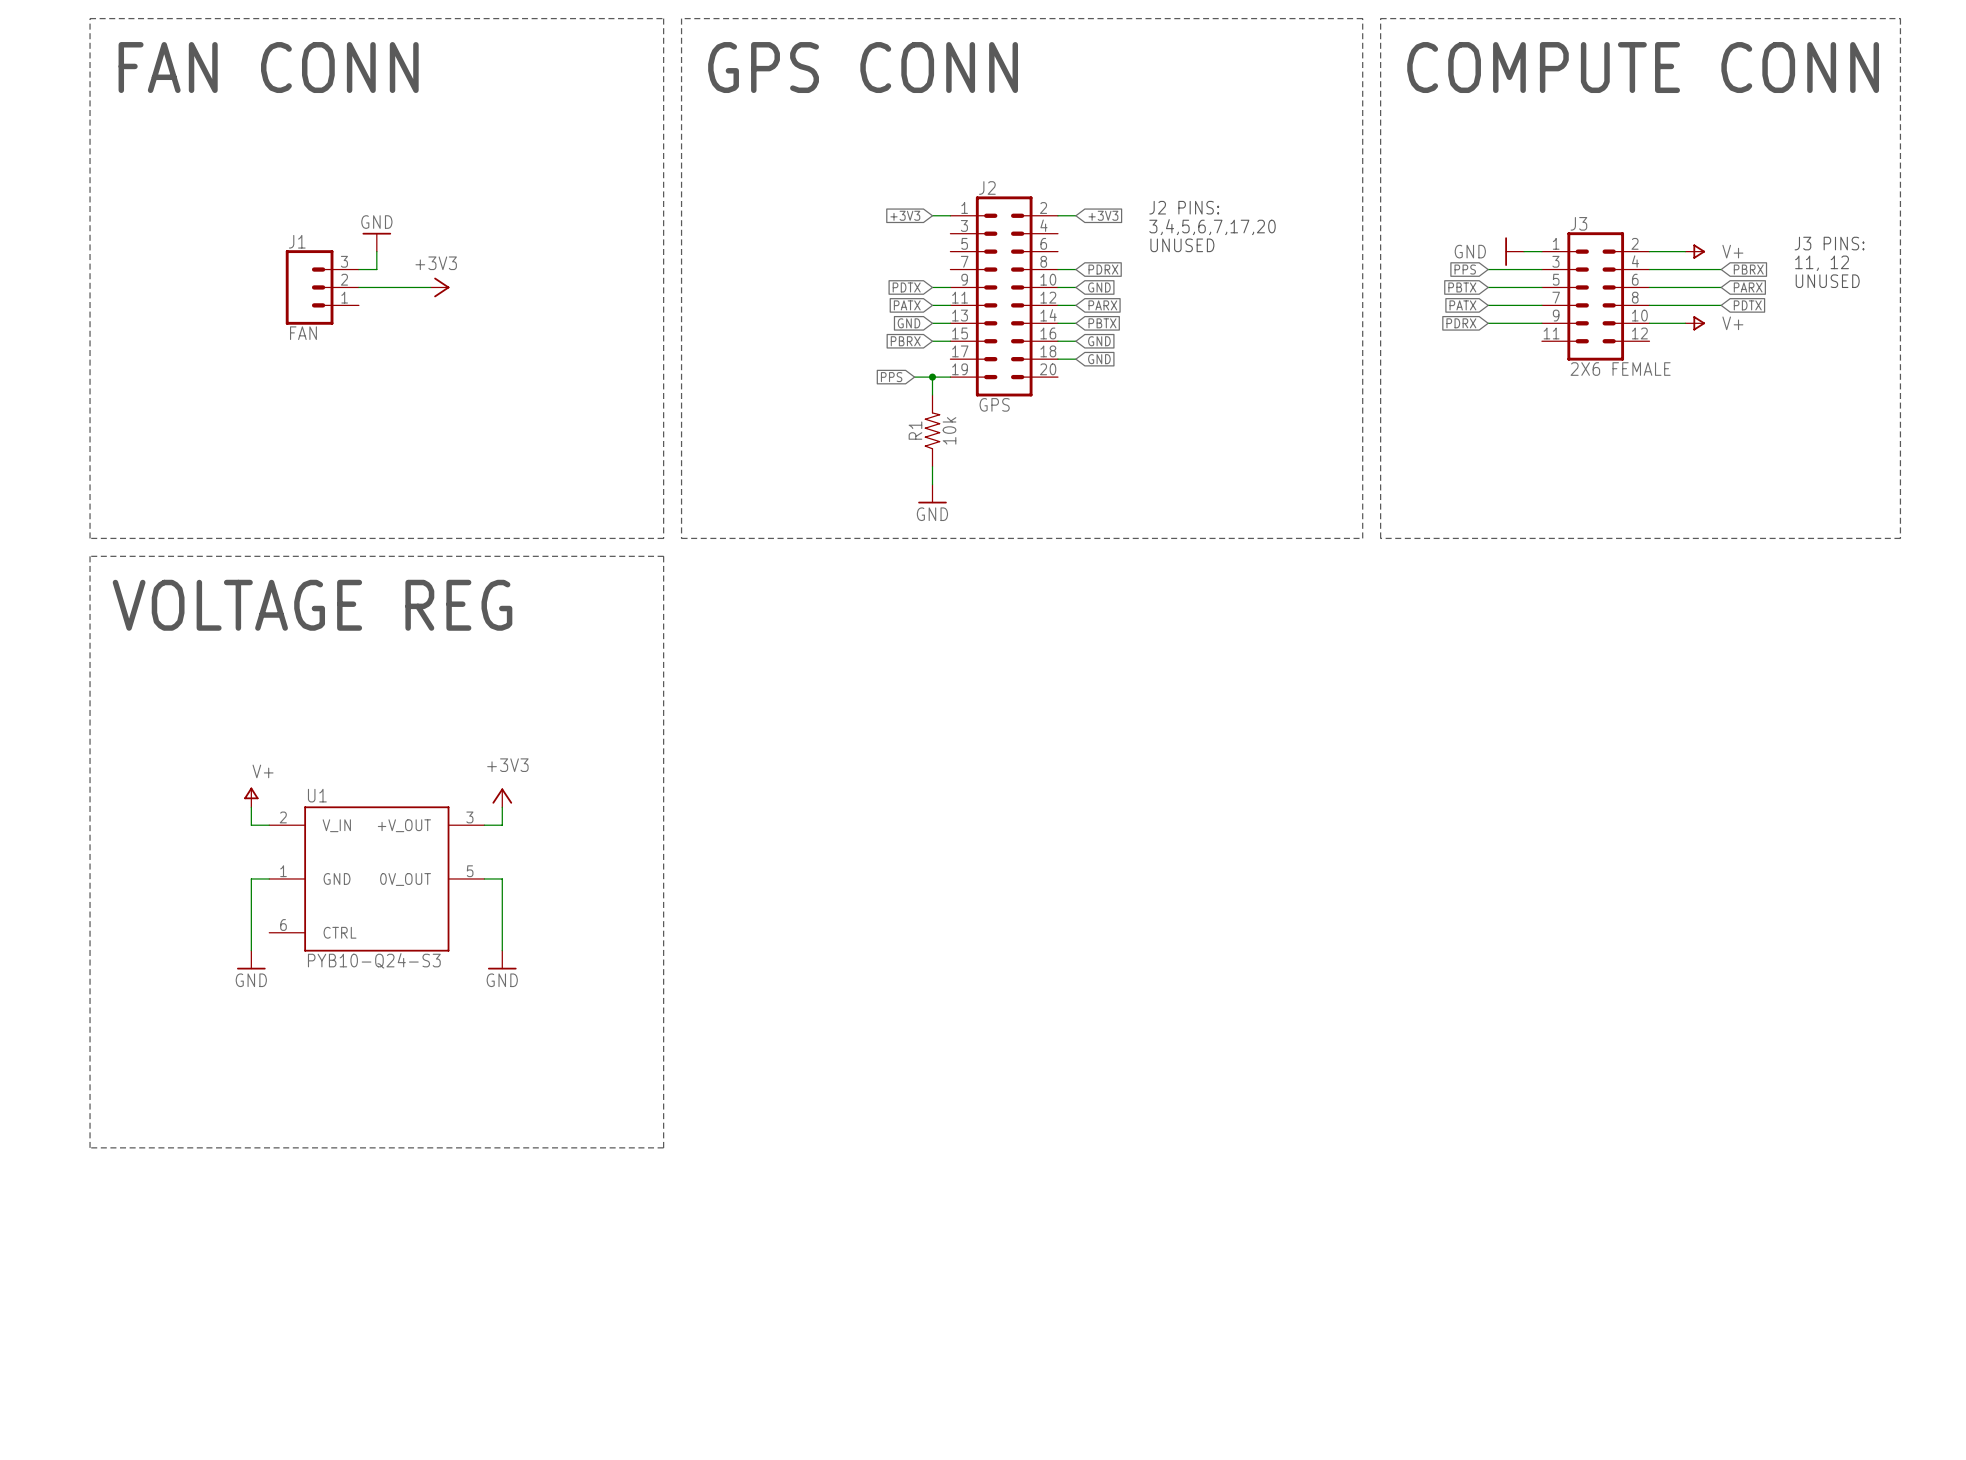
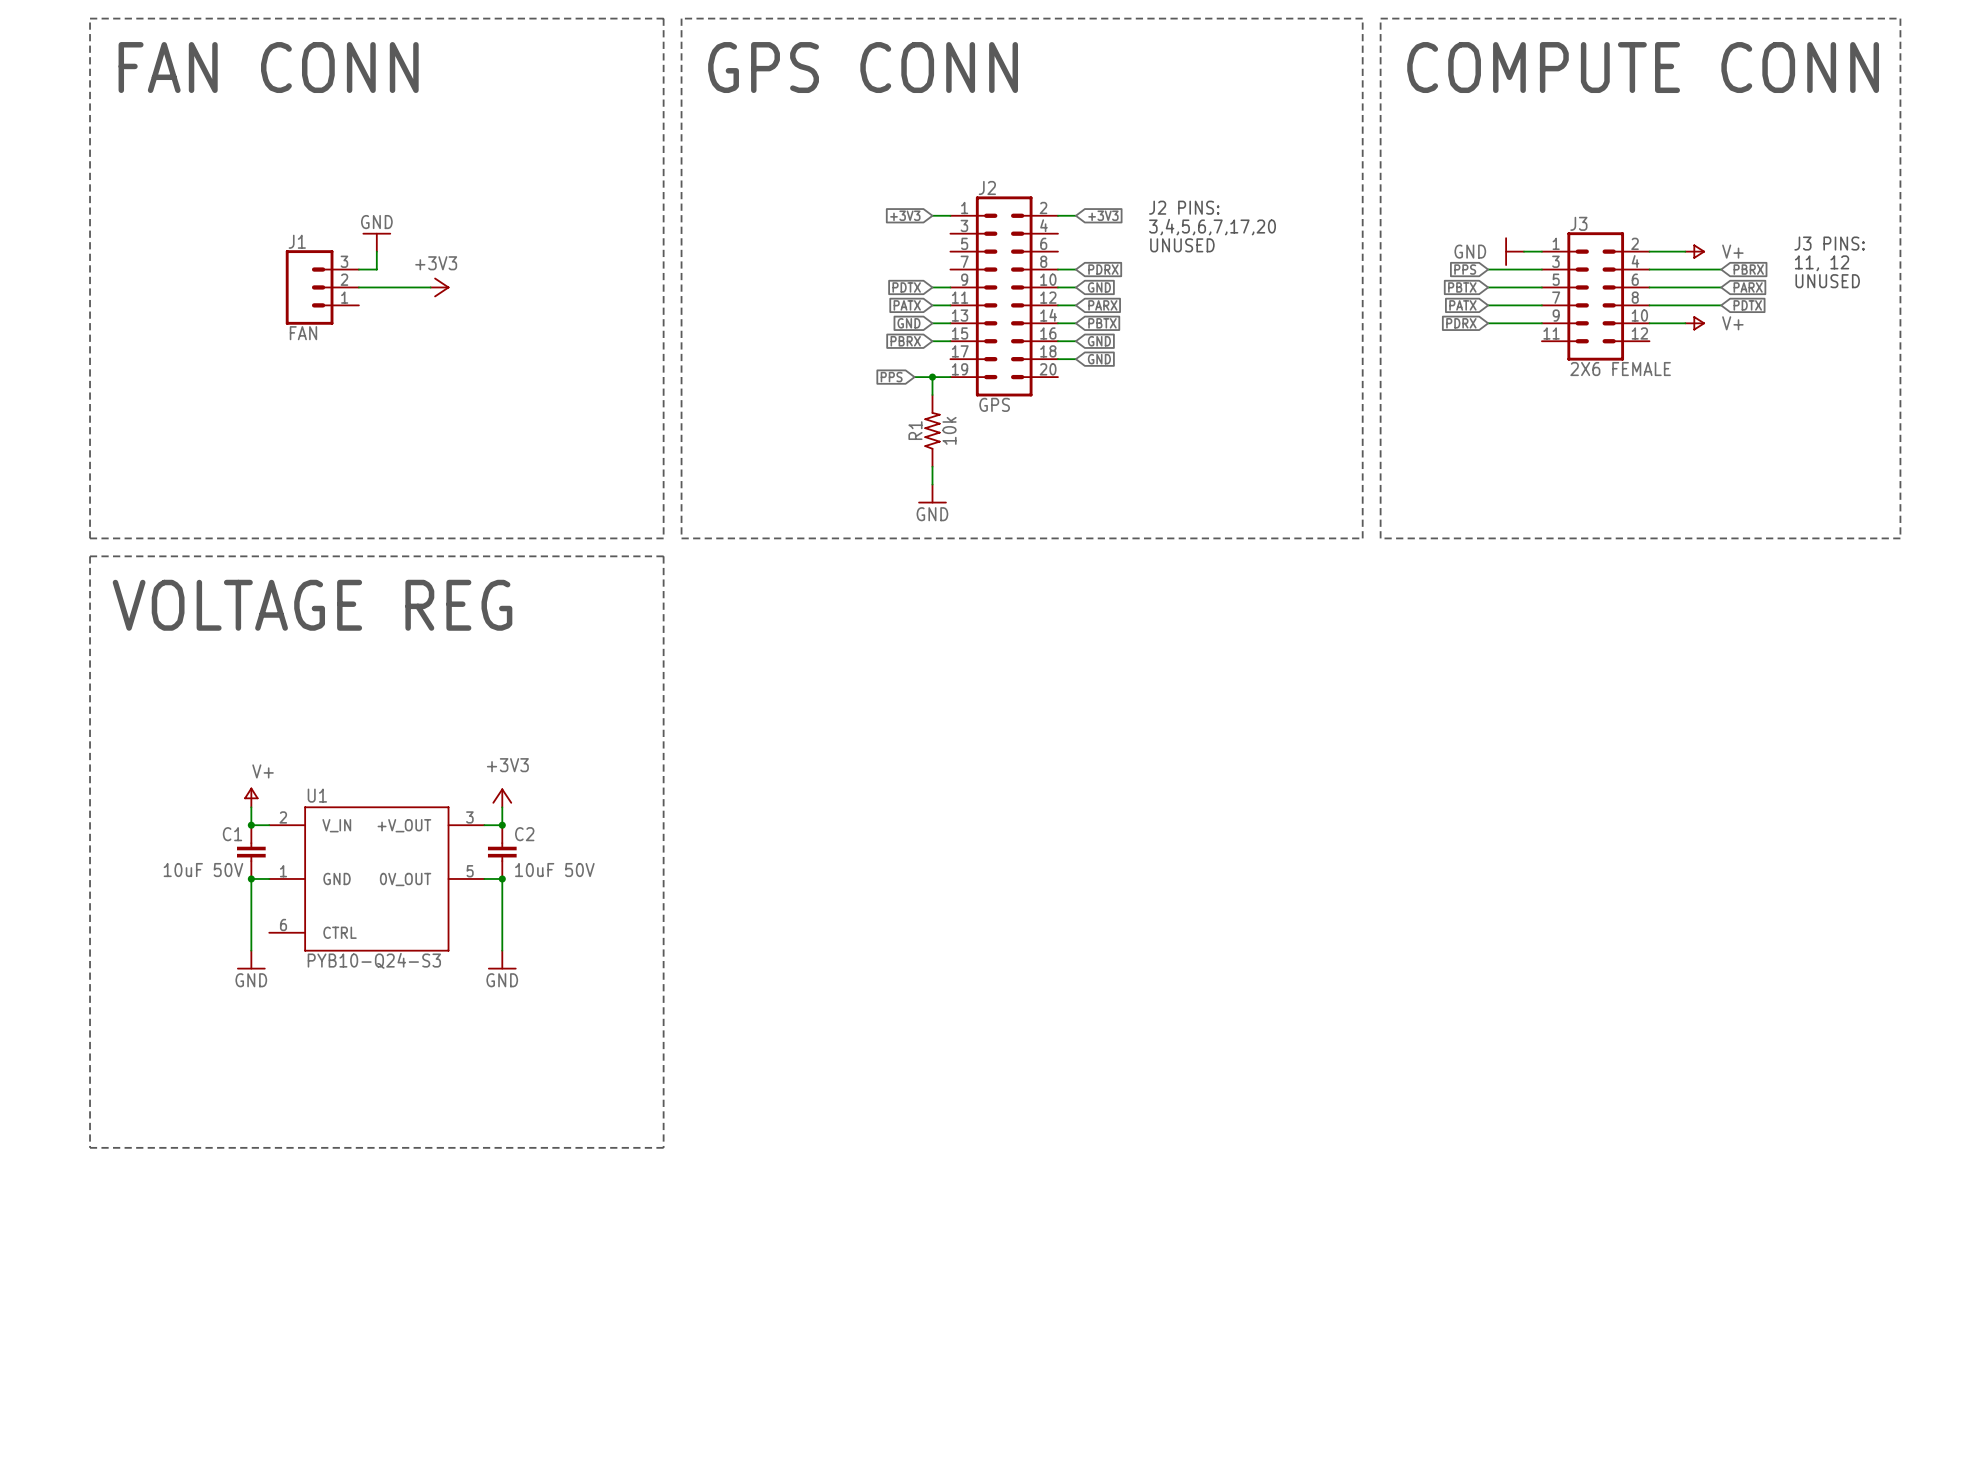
junction: none -> (251, 825)
junction: none -> (502, 825)
C1: none -> 10uF 50V (251, 852)
C2: none -> 10uF 50V (502, 852)
junction: none -> (251, 878)
junction: none -> (502, 878)

